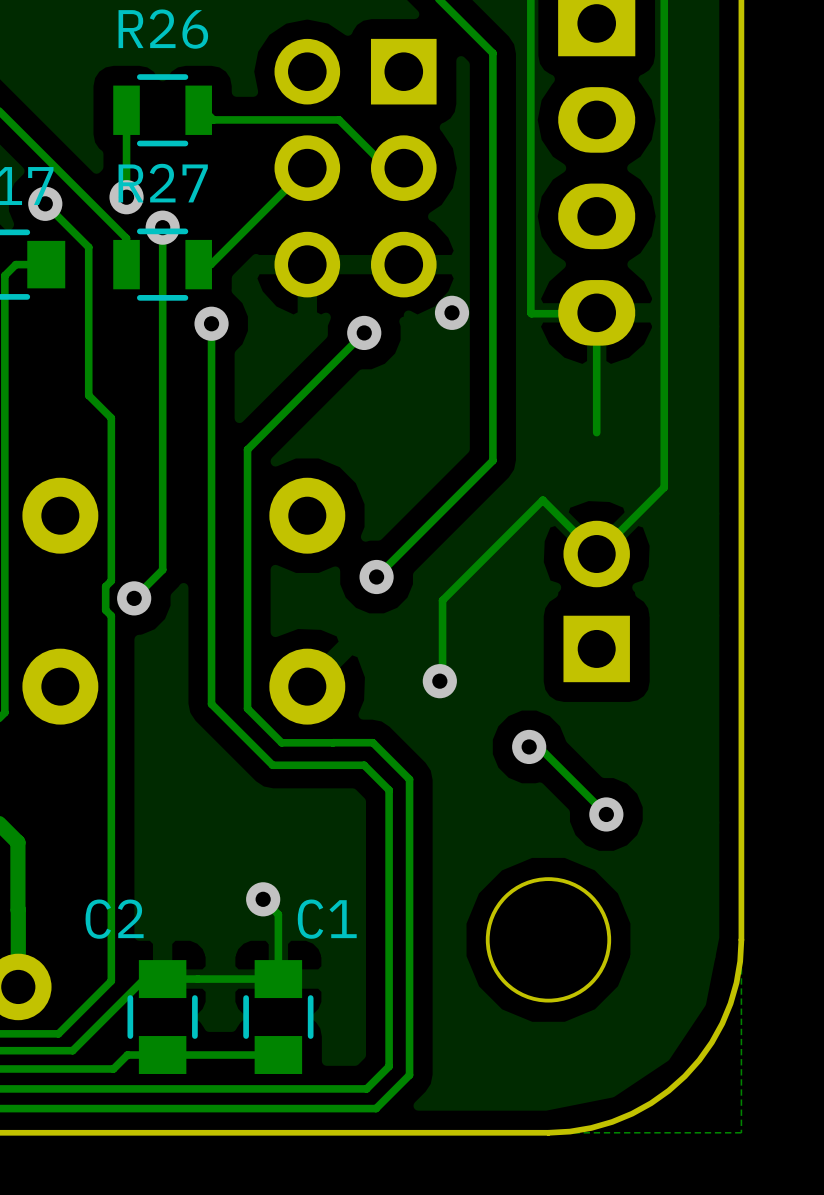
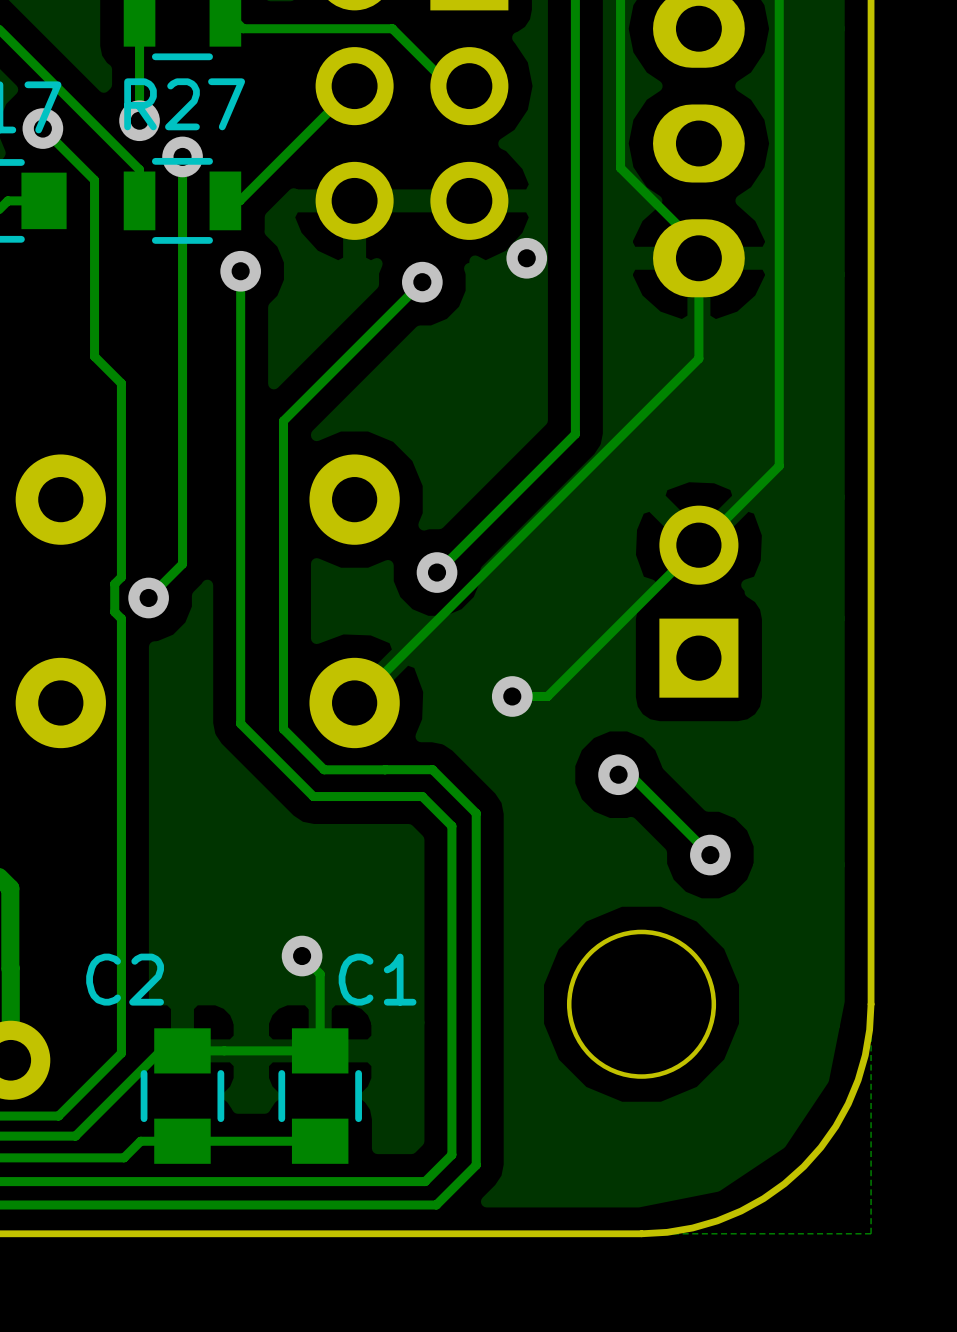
track: (530, 237) (530, 313) (596, 312) -> (620, 168) (679, 226) (679, 238) (698, 258)
track: (596, 397) (596, 432) -> (698, 358) (354, 702)
track: (596, 554) (542, 500) (442, 600) (442, 681) -> (698, 545) (547, 696) (515, 696)

